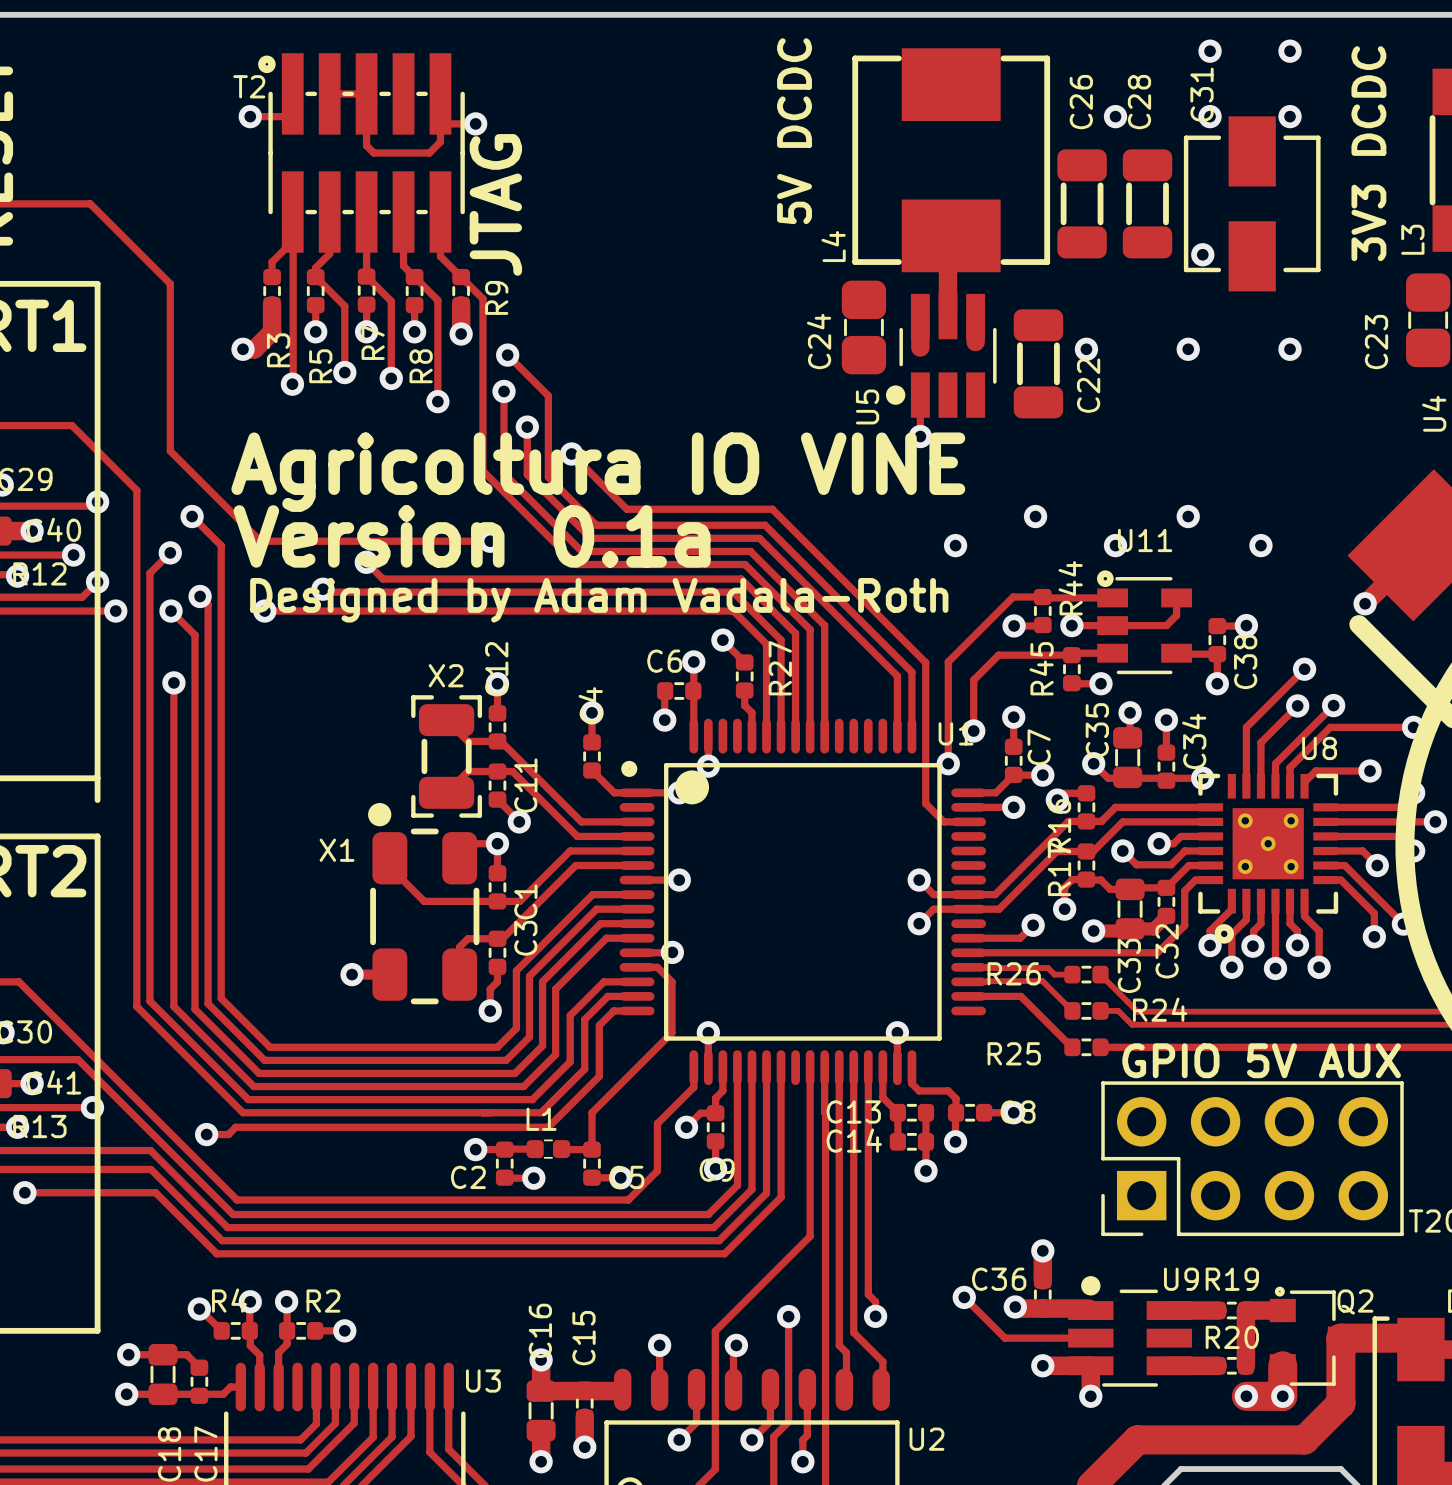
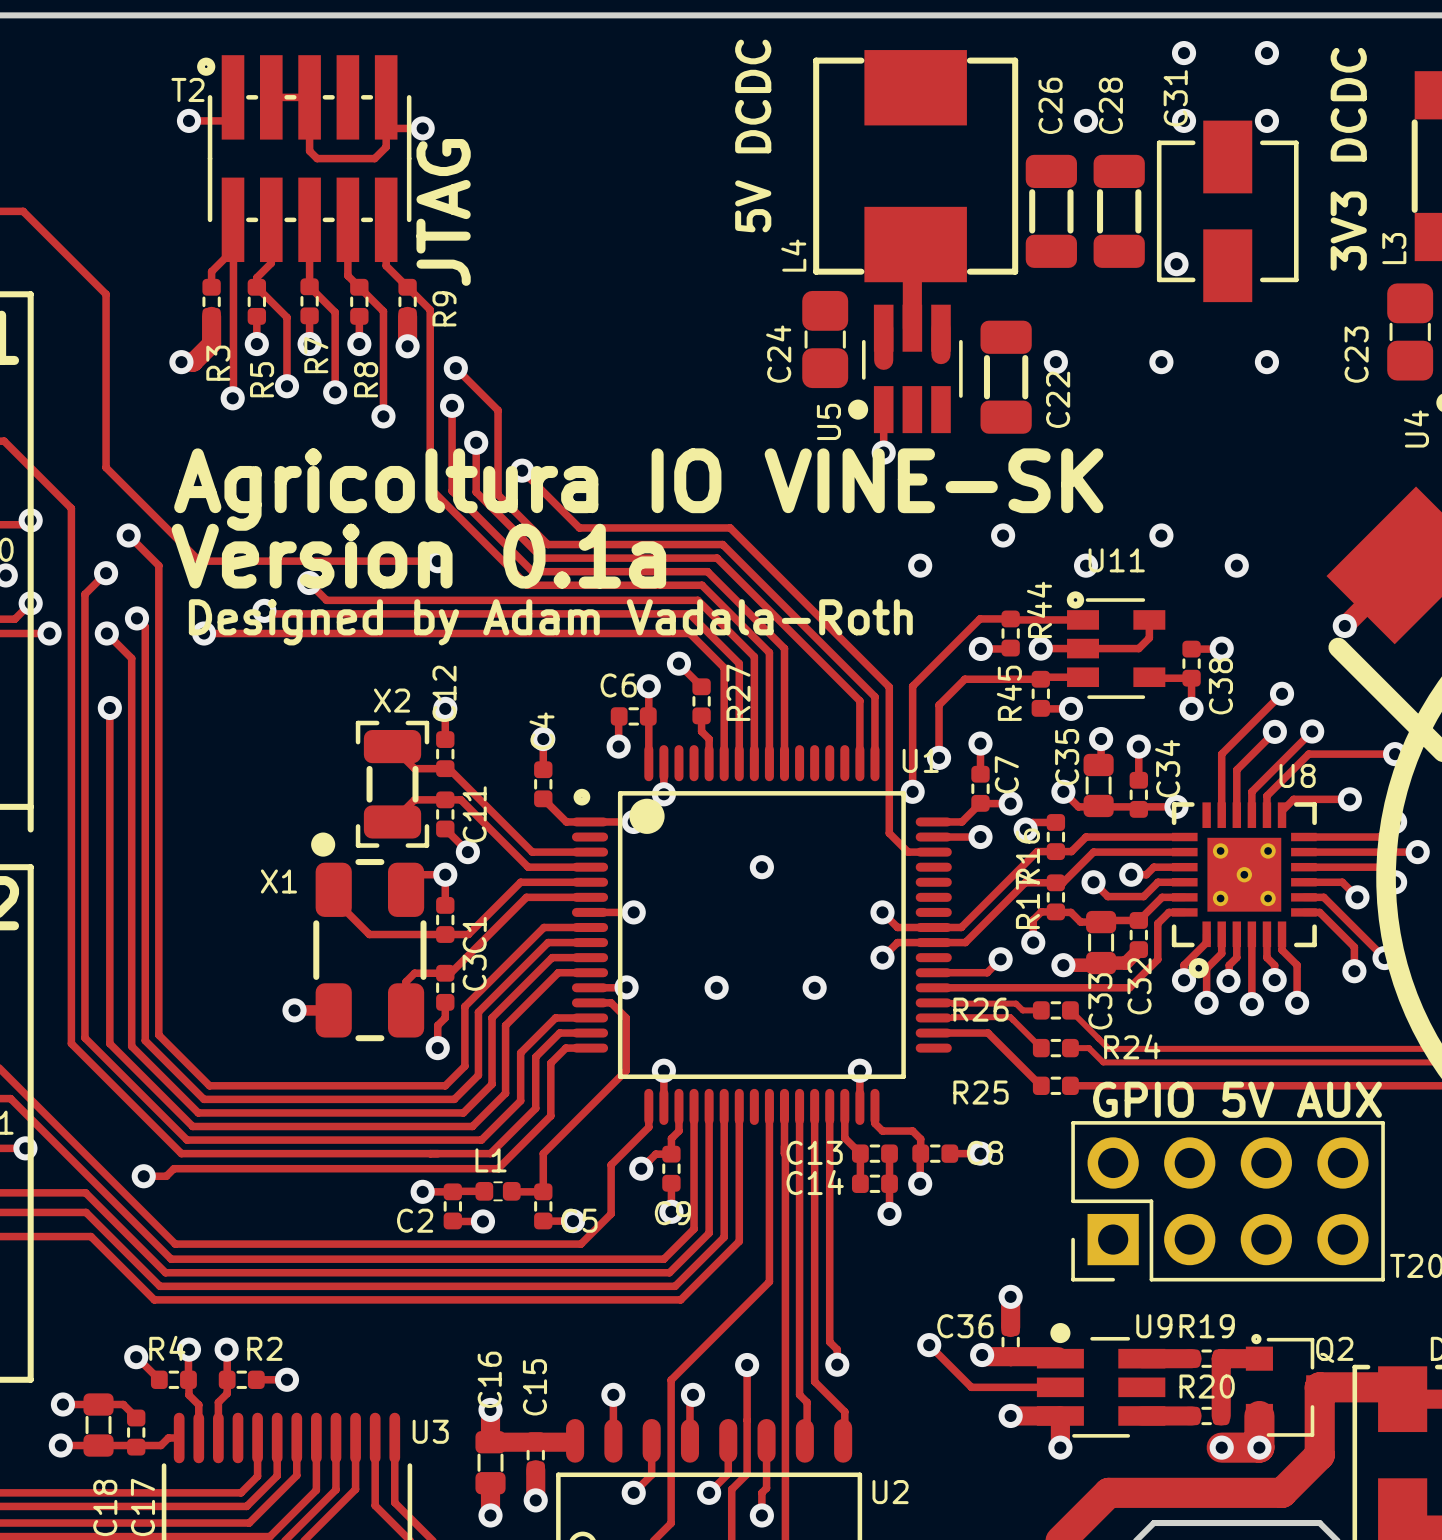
text: Agricoltura IO VINE (598, 472) -> Agricoltura IO VINE-SK (638, 489)
via: none -> (761, 867)
via: none -> (716, 987)
via: none -> (814, 987)

